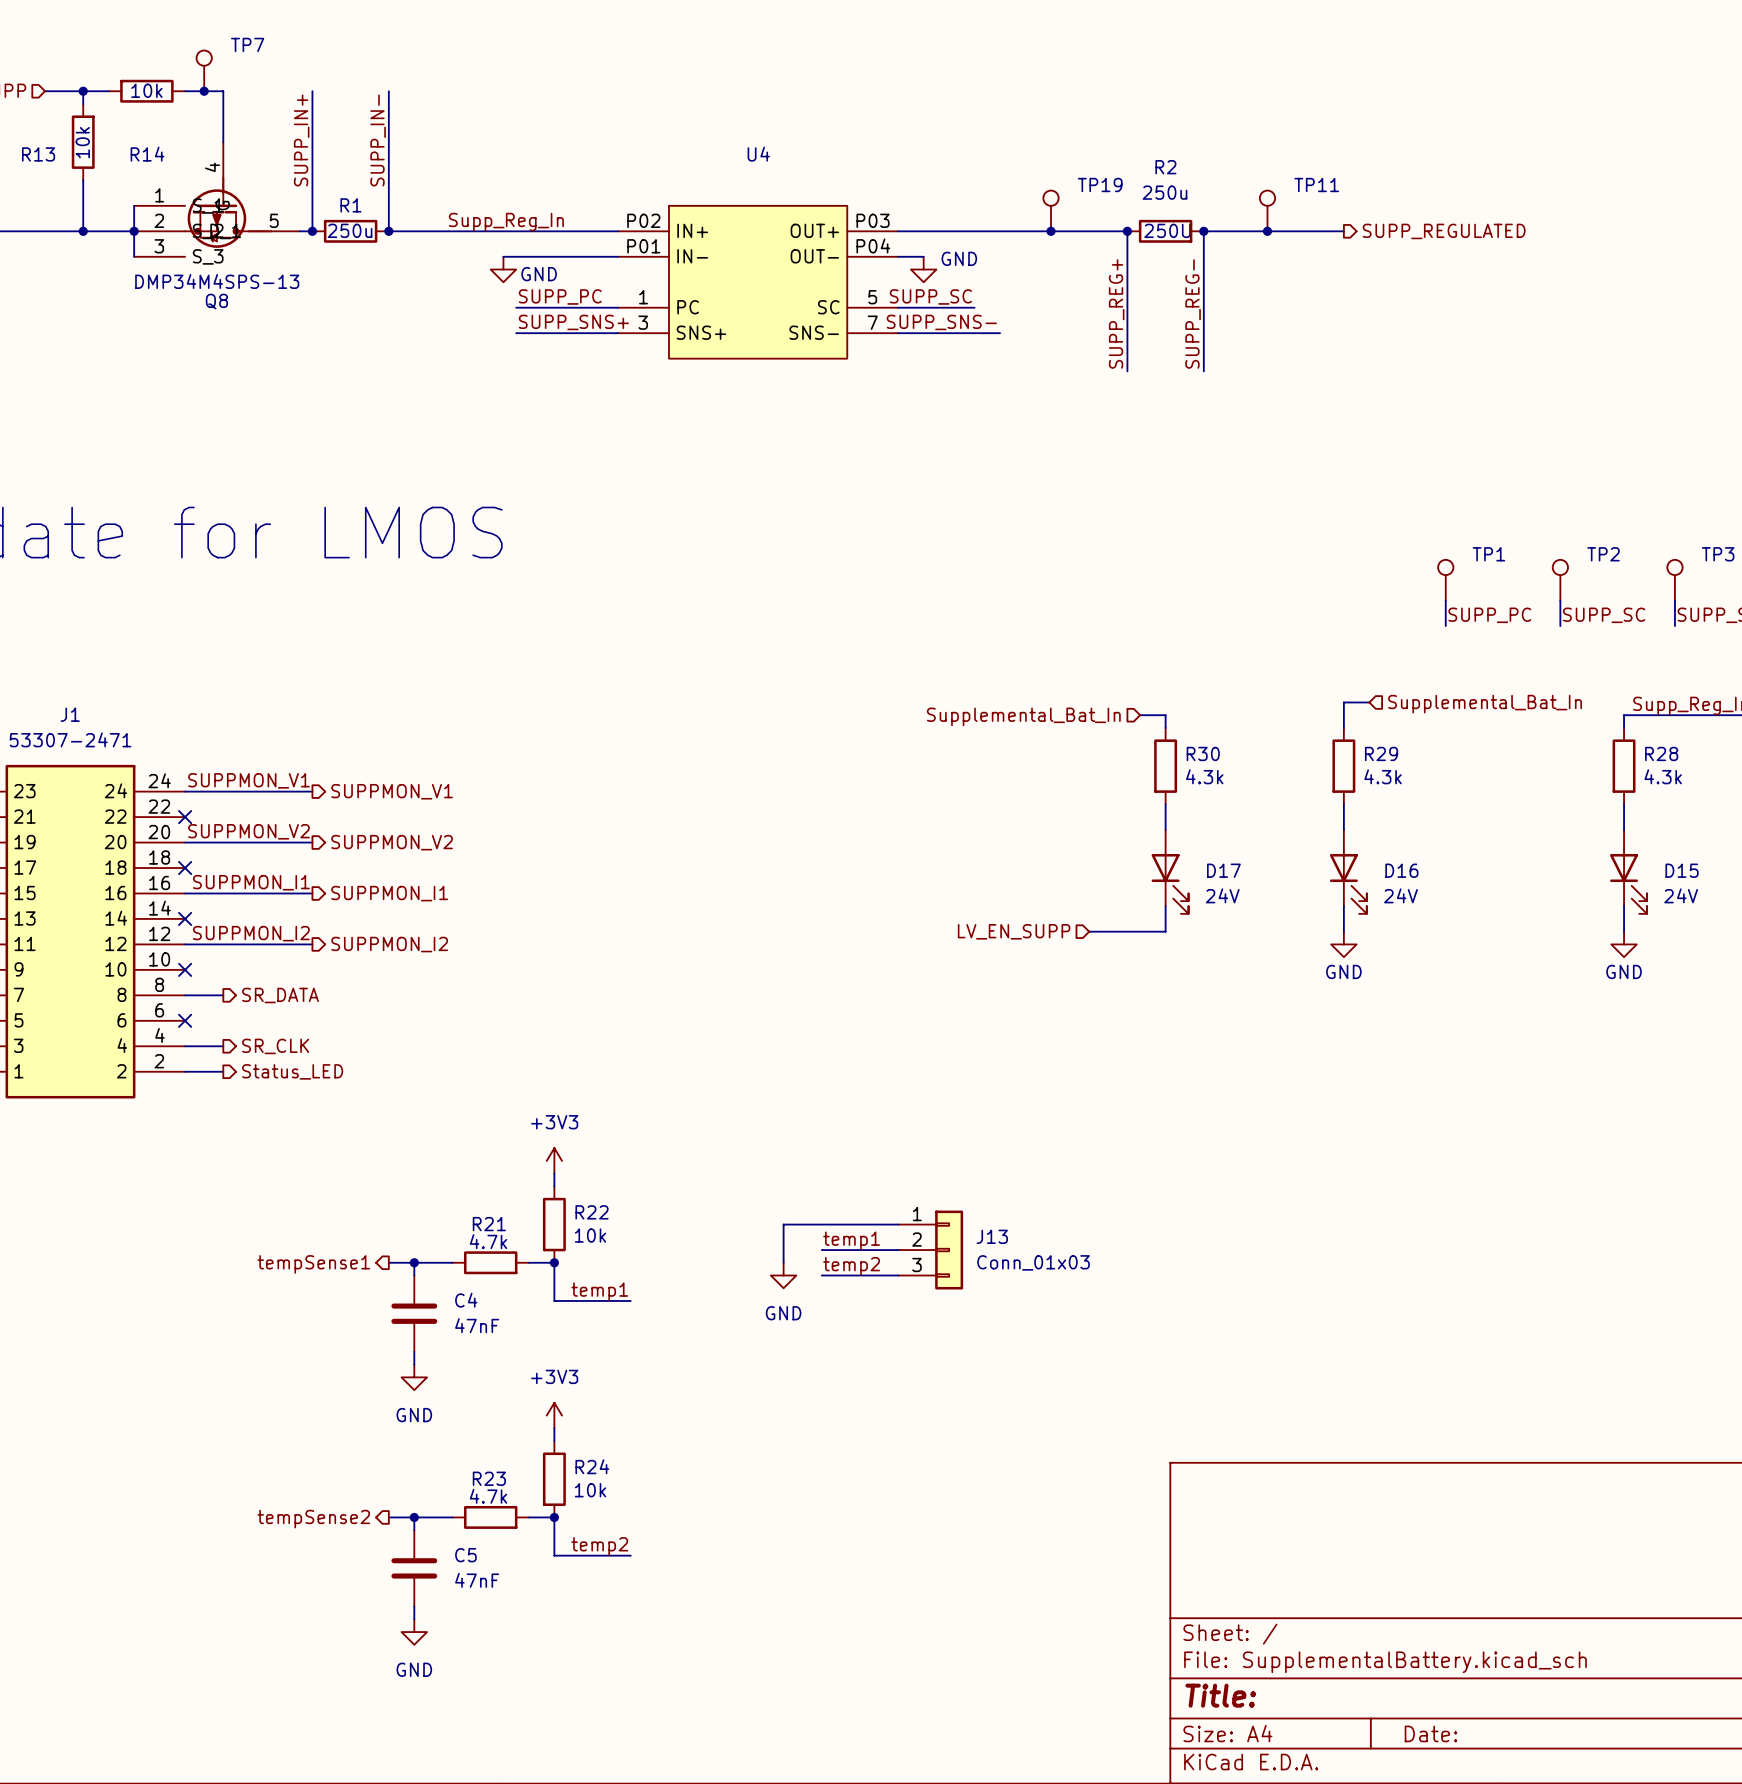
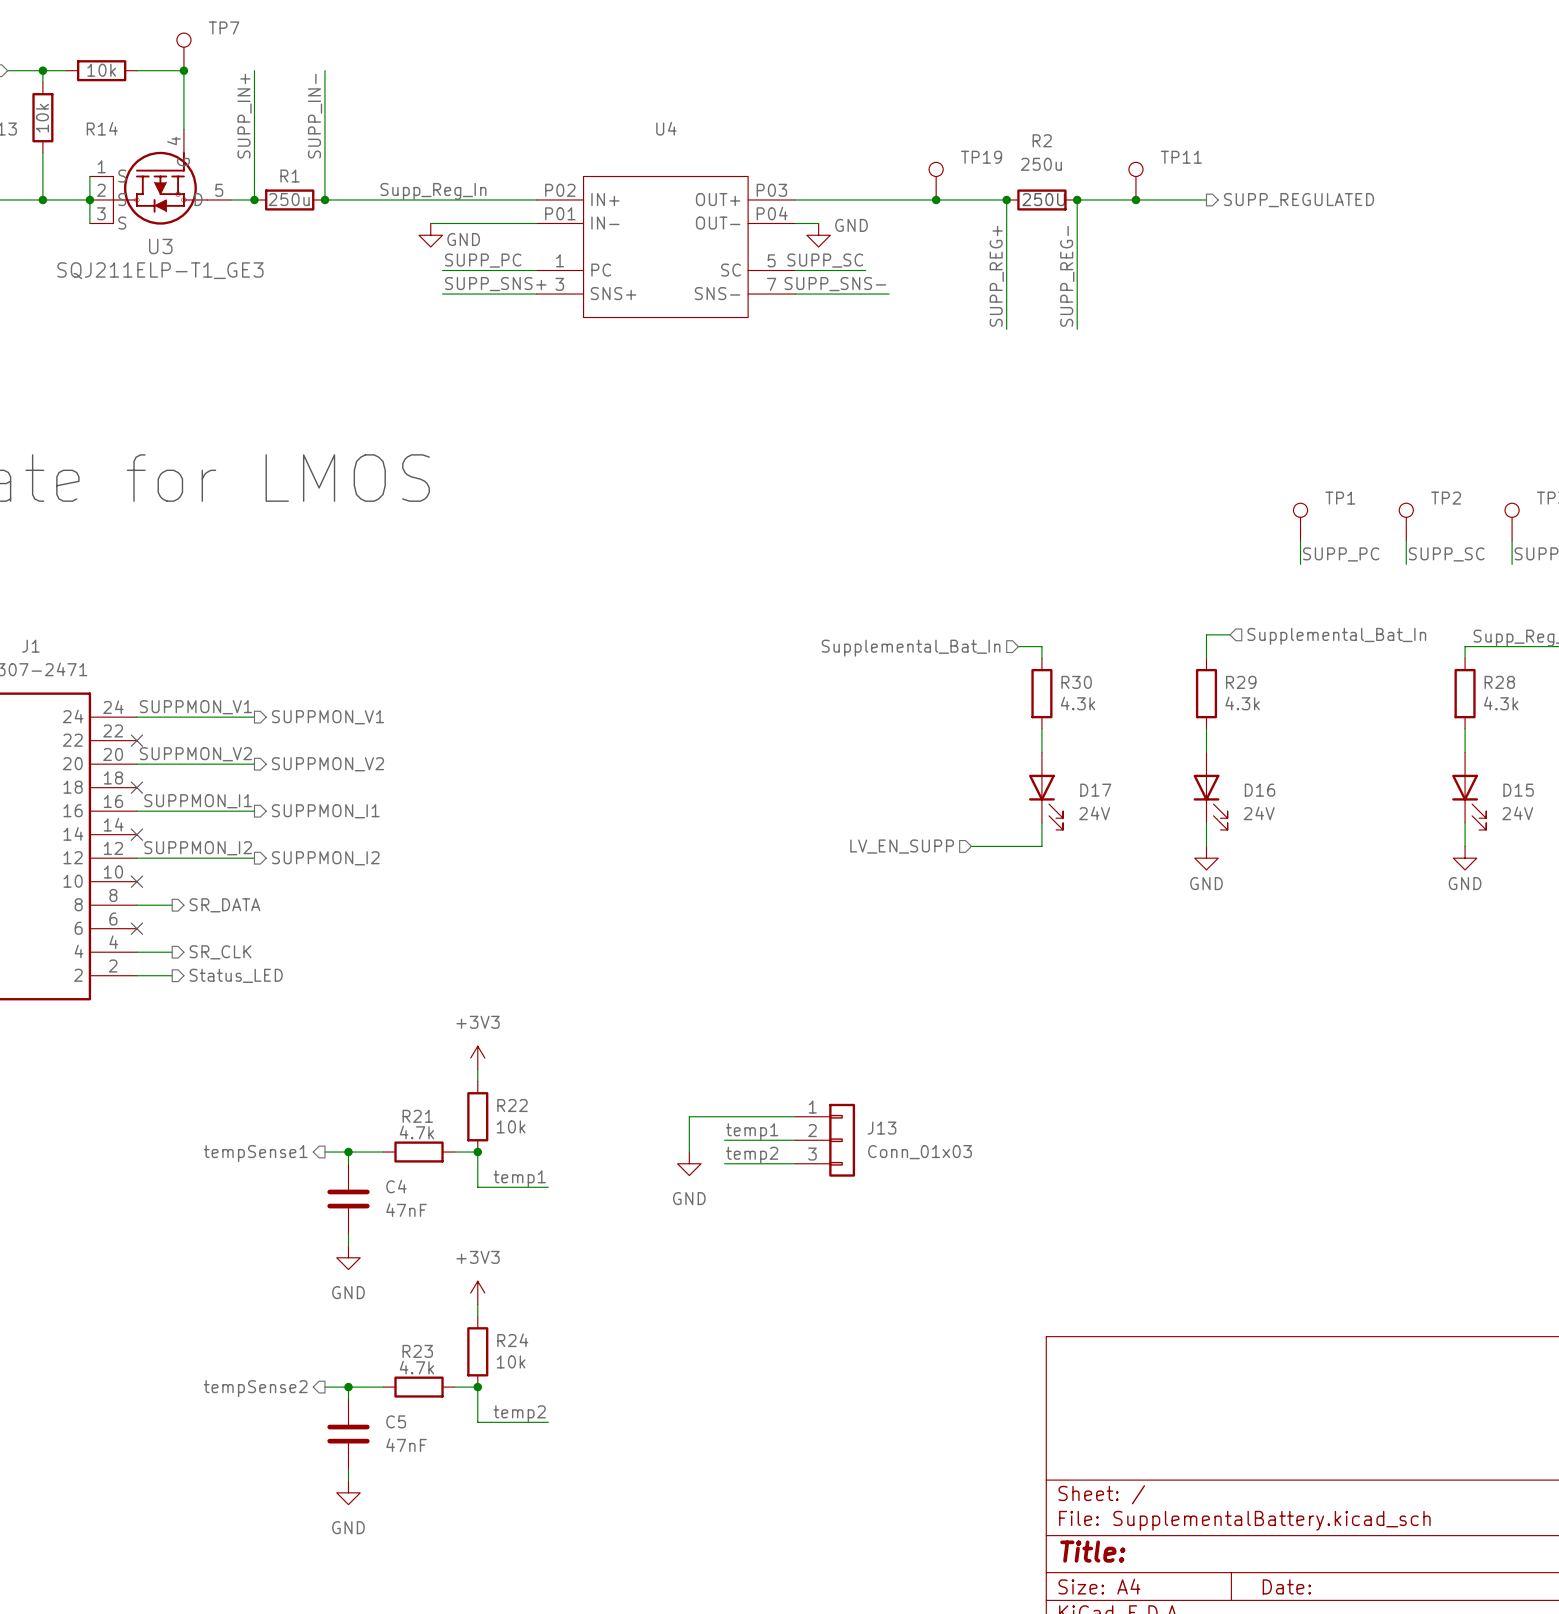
TP7 position: (204, 70) -> (183, 51)
junction position: (204, 91) -> (183, 70)
wire: (223, 91) (223, 142) -> (172, 70) (183, 70) (183, 129)
Q8: DMP34M4SPS-13 (216, 199) -> none
U3: none -> SQJ211ELP-T1_GE3 (160, 177)

